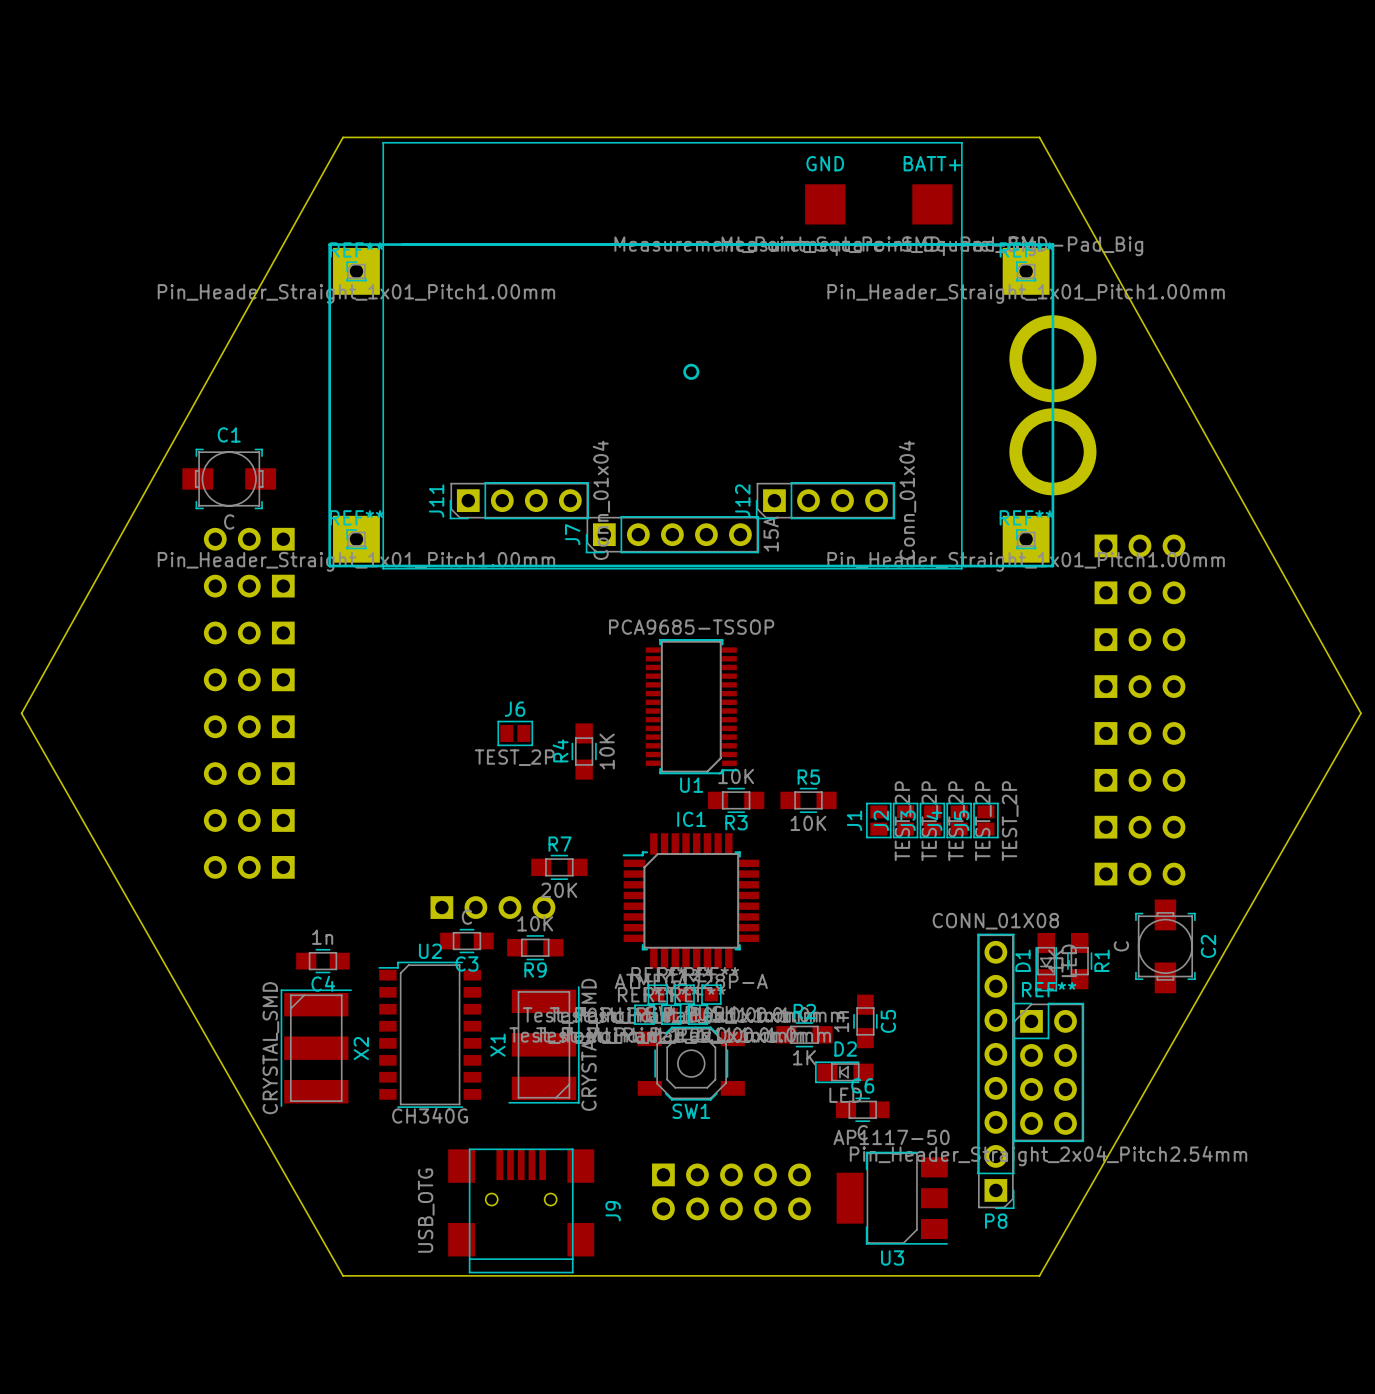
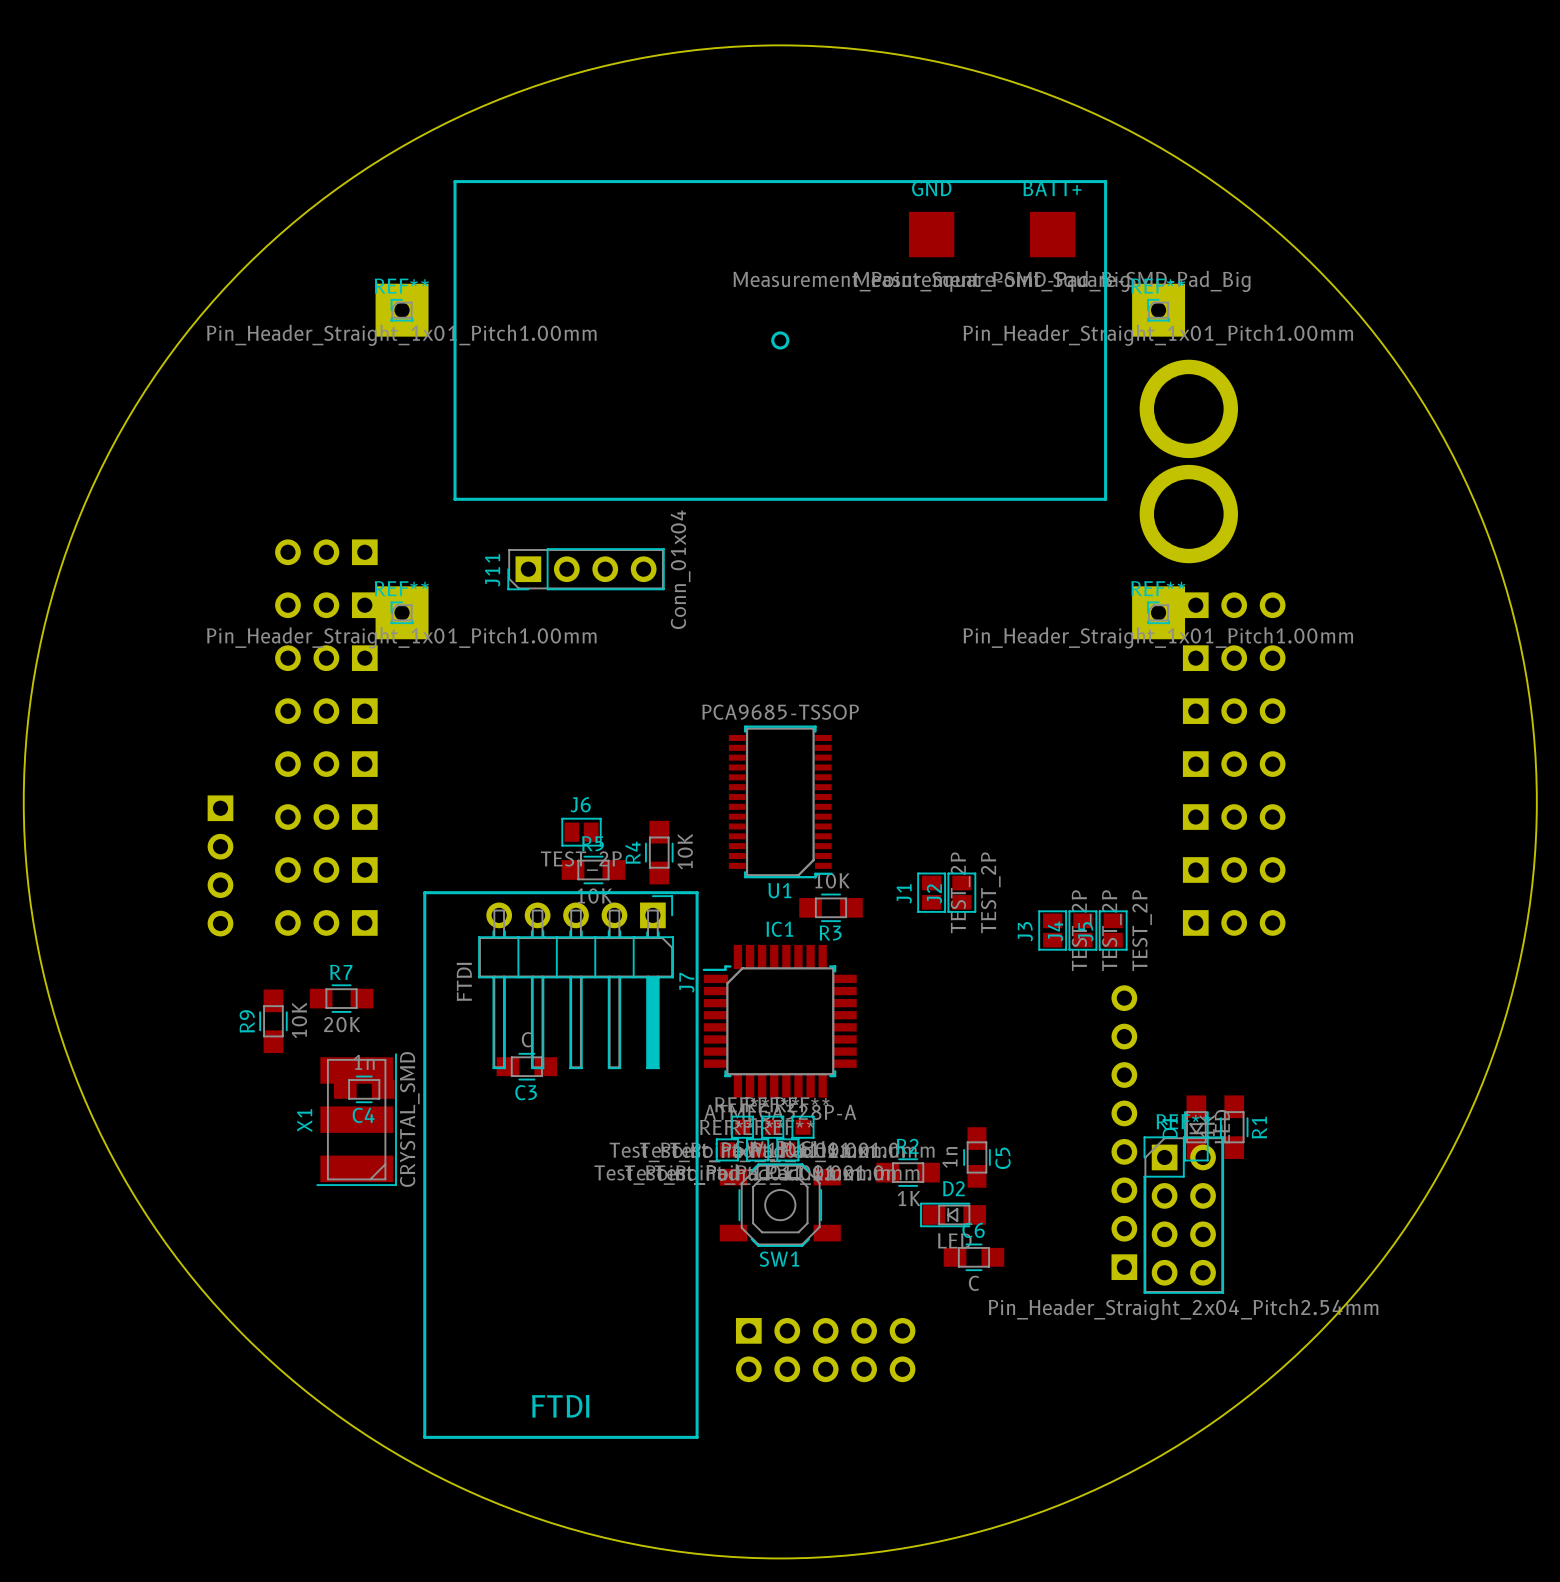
round board edge: none -> [23, 44, 1538, 1560]
board edge: (343, 137) (1039, 137) (1360, 713) (1039, 1275) (343, 1275) (21, 713) (343, 137) -> none
line: (383, 142) (961, 142) (961, 568) (383, 568) (383, 142) -> (455, 181) (455, 499) (1105, 499) (1105, 181) (455, 181)
line: (329, 244) (329, 566) (1052, 566) (1052, 244) (329, 244) -> none
drawing position: (691, 371) -> (780, 340)
C1: C (229, 478) -> none
part: none -> (326, 552)
J12: Conn_01x04 (825, 500) -> none
J7 footprint: [585, 516, 760, 554] -> [478, 895, 674, 1070]
part: none -> (326, 605)
part: none -> (1234, 605)
J7 name position: J7 (572, 534) -> J7 (686, 982)
J7 value: 15A (771, 534) -> FTDI (464, 981)
part: (249, 539) -> none
part: (1139, 545) -> none
part: none -> (326, 658)
part: none -> (1234, 658)
part: (249, 586) -> none
part: (1139, 592) -> none
part: none -> (326, 711)
part: none -> (1234, 711)
part: (249, 632) -> none
part: (1139, 639) -> none
part: none -> (326, 764)
part: none -> (1234, 764)
part: (249, 679) -> none
part: (1139, 686) -> none
part: none -> (326, 817)
part: none -> (1234, 817)
part: (249, 726) -> none
part: (1139, 733) -> none
part: none -> (326, 869)
part: none -> (1234, 869)
part: (249, 773) -> none
part: (1139, 780) -> none
line: none -> (424, 892) (424, 1437) (697, 1437) (697, 892) (424, 892)
R5 position: (808, 800) -> (593, 869)
part: none -> (326, 922)
part: none -> (1234, 922)
part: (249, 820) -> none
J1 position: (878, 820) -> (931, 892)
J2 position: (905, 820) -> (961, 892)
part: (1139, 827) -> none
part: (249, 867) -> none
R7 position: (559, 867) -> (341, 998)
part: (1139, 874) -> none
part rotation: 0° (492, 907) -> 90° clockwise (220, 865)
part position: (492, 907) -> (220, 865)
C2: C (1165, 946) -> none
R9 rotation: 0° (535, 947) -> 90° clockwise (273, 1021)
R9 position: (535, 947) -> (273, 1021)
R1 position: (1079, 961) -> (1234, 1127)
D1 position: (1046, 962) -> (1196, 1128)
U2: CH340G (429, 1034) -> none
X1 position: (543, 1044) -> (356, 1119)
X2: CRYSTAL_SMD (316, 1048) -> none
P8 side: top (995, 1071) -> bottom (1124, 1132)
U3: AP1117-50 (892, 1198) -> none
J9: USB_OTG (521, 1210) -> none
text: none -> FTDI (560, 1406)

